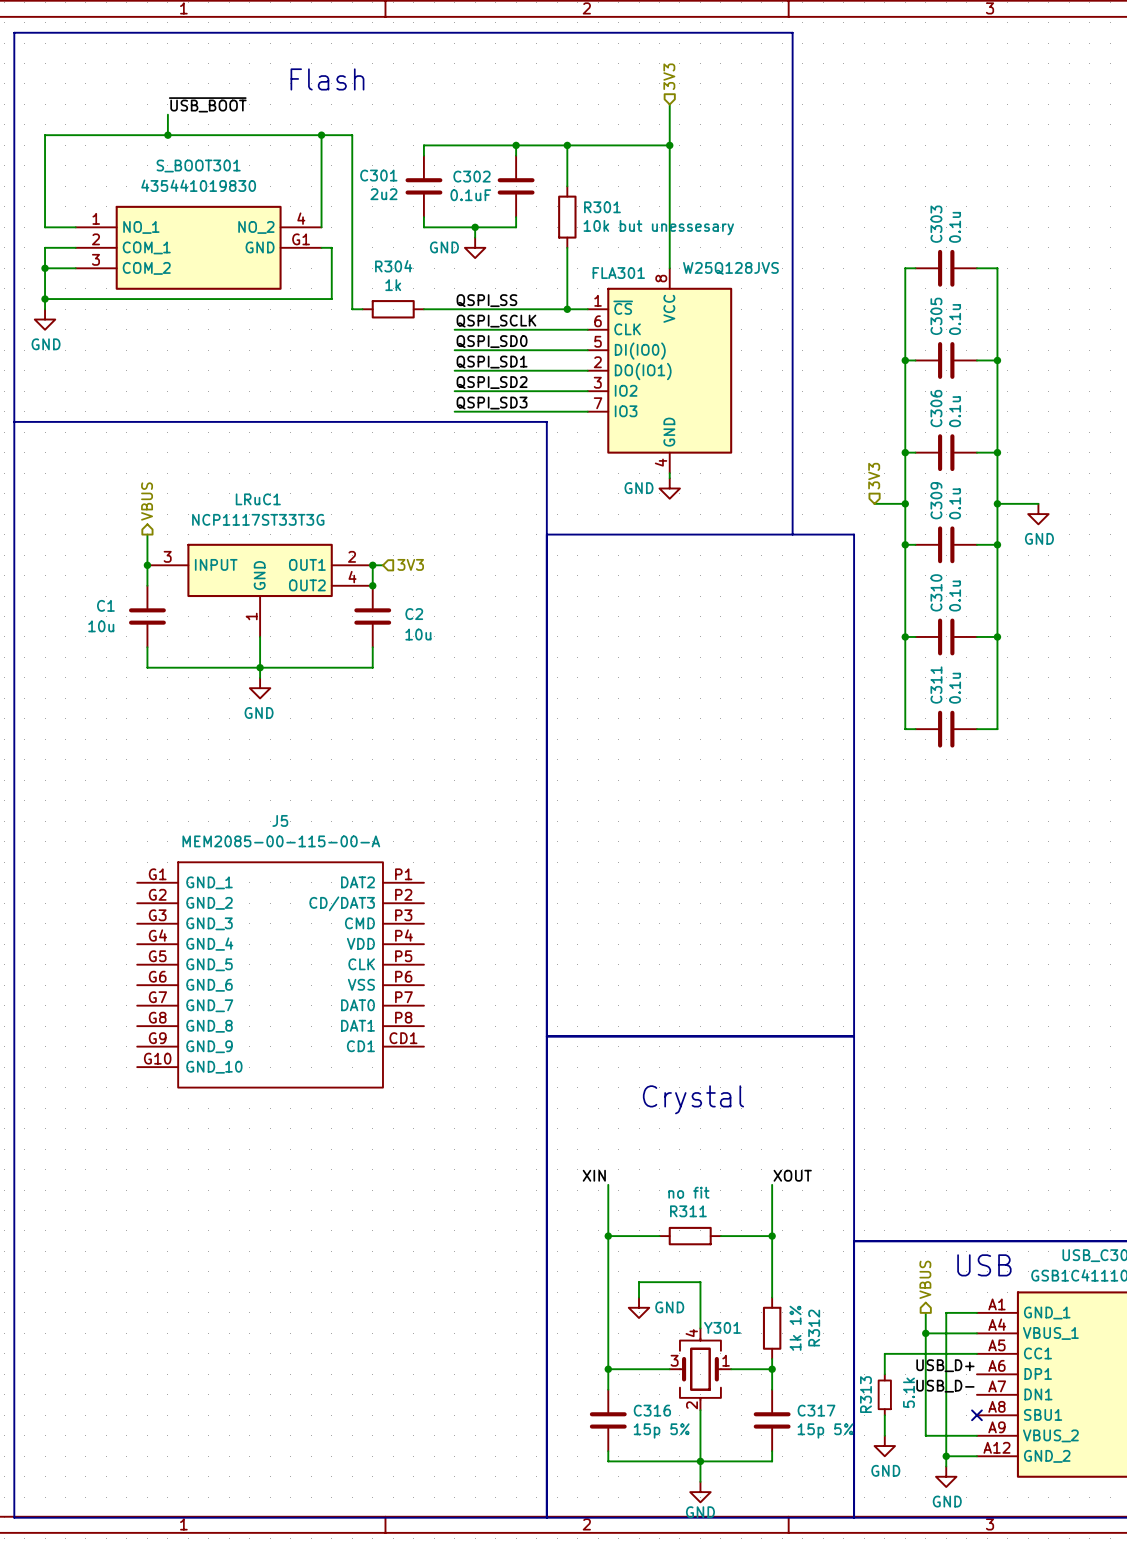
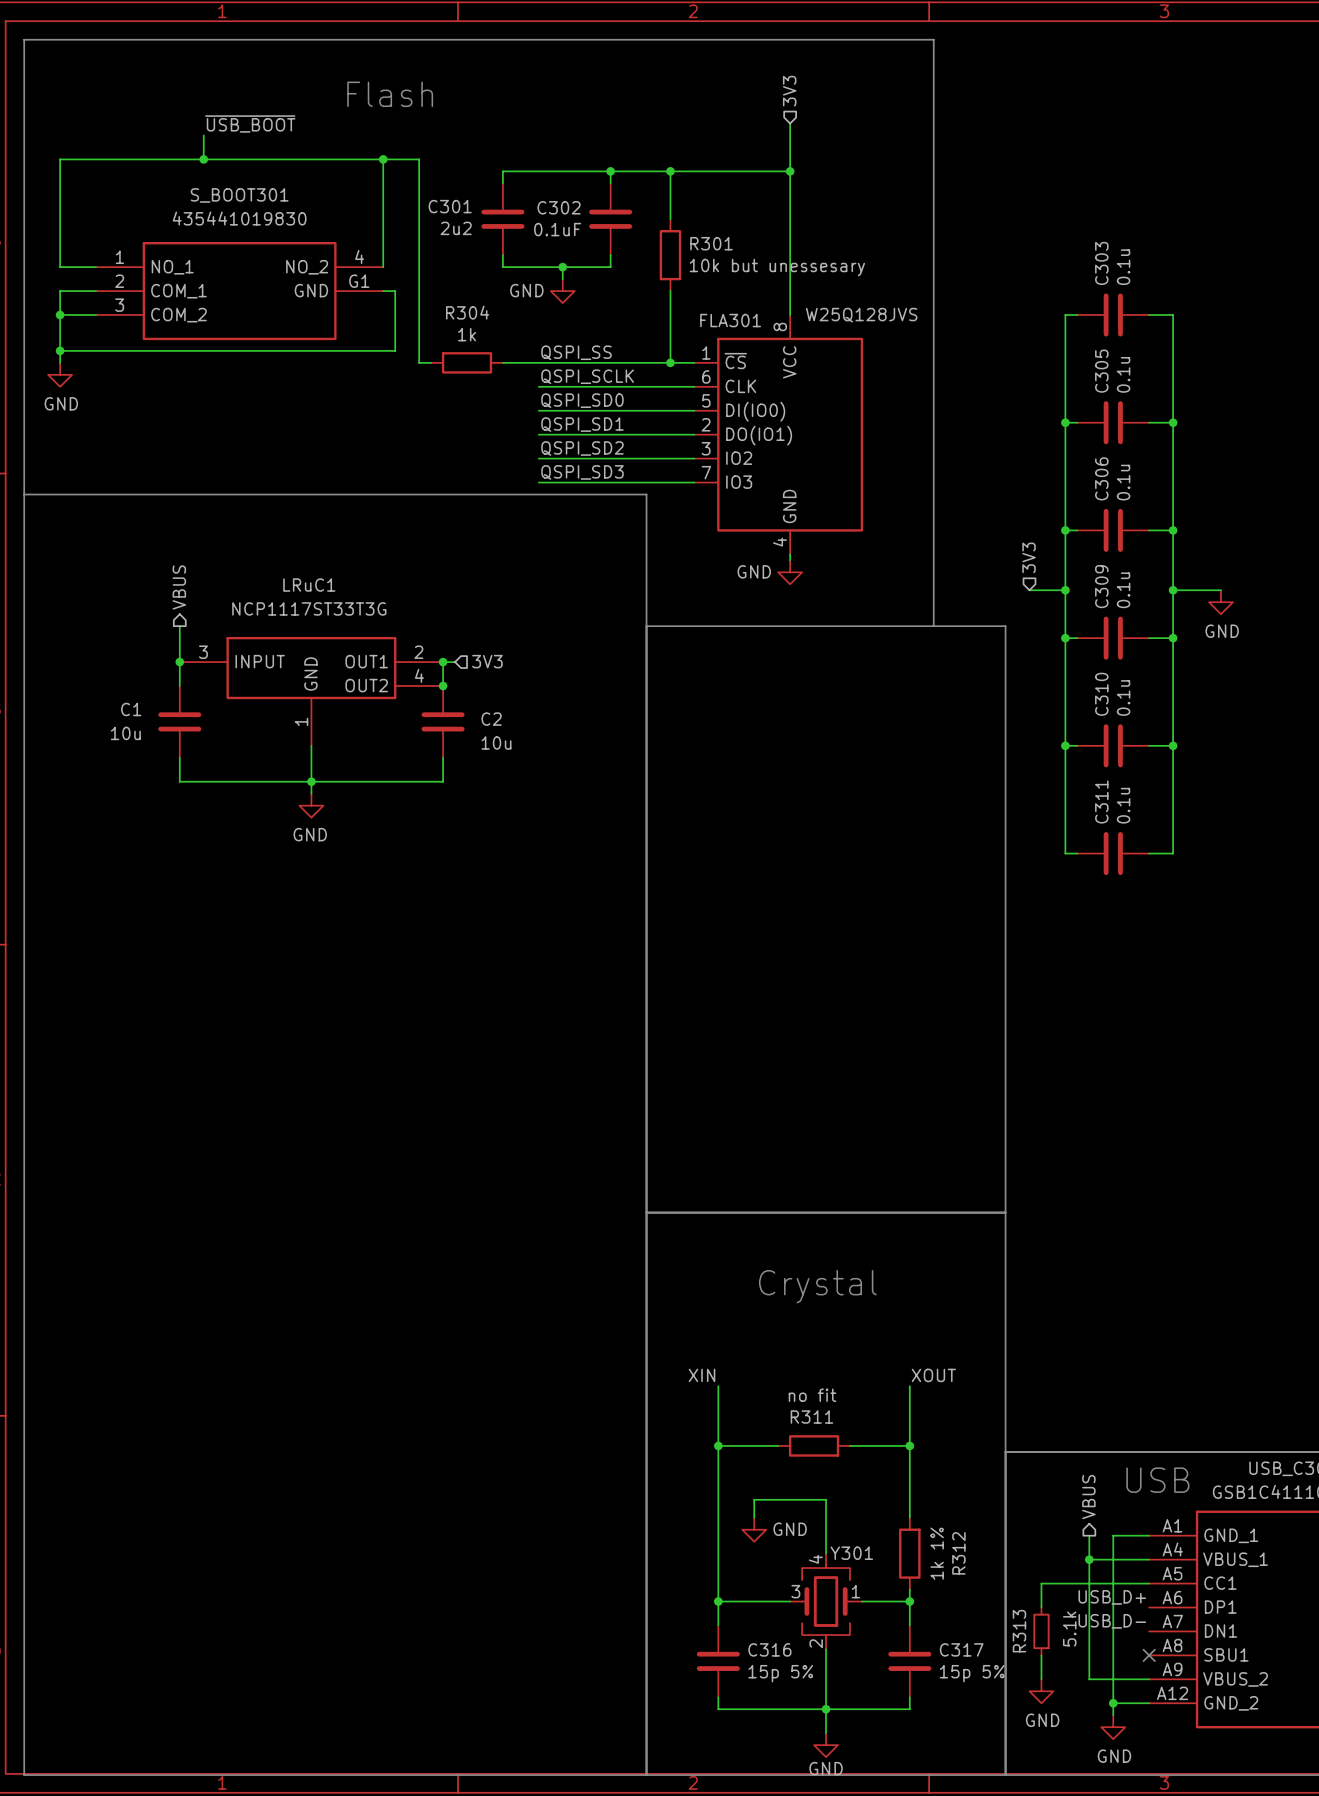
J5: MEM2085-00-115-00-A (280, 974) -> none

